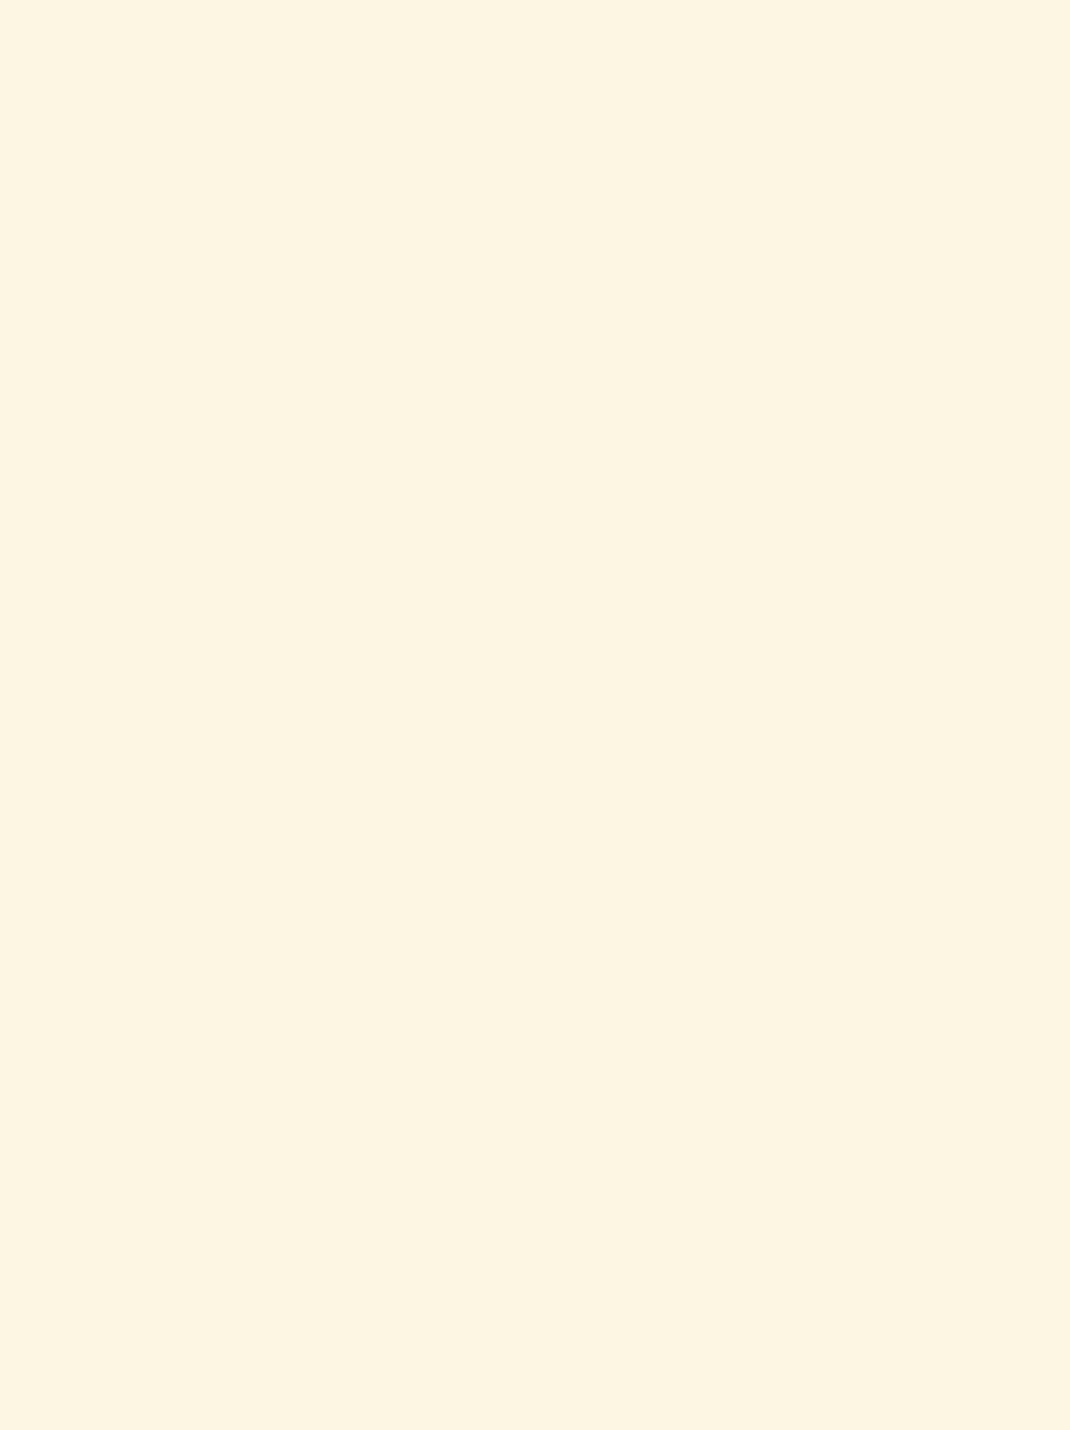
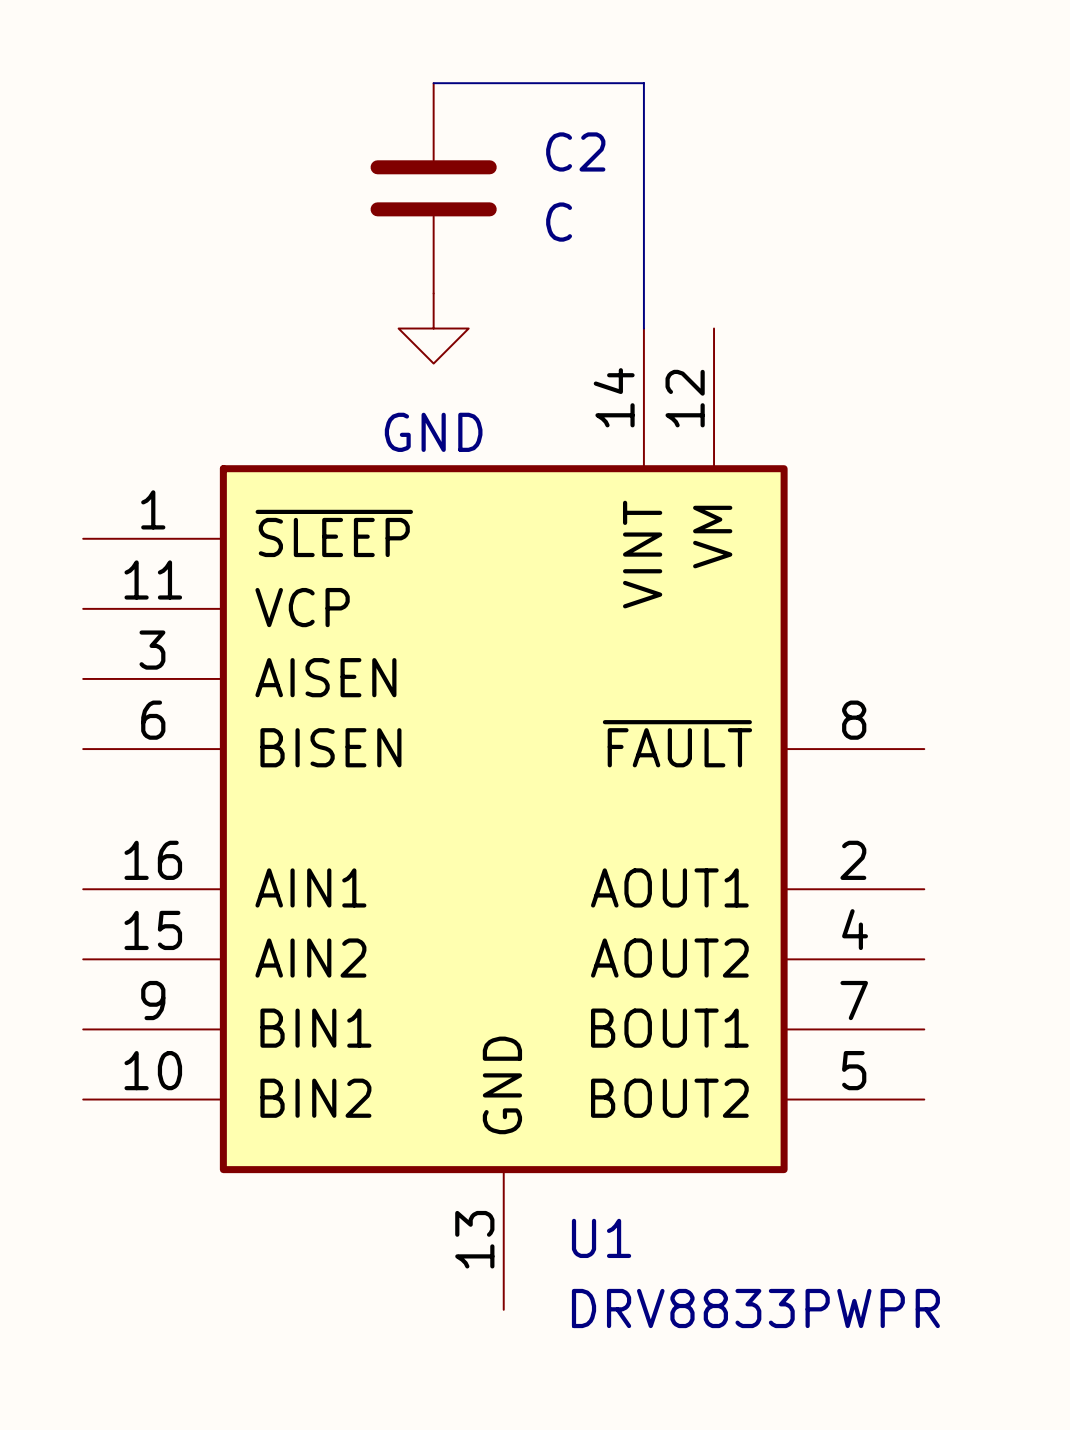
wire: none -> (433, 83) (643, 83) (643, 328)
C2: none -> C (433, 188)
power symbol: none -> GND (433, 328)
U1: none -> DRV8833PWPR (503, 819)

